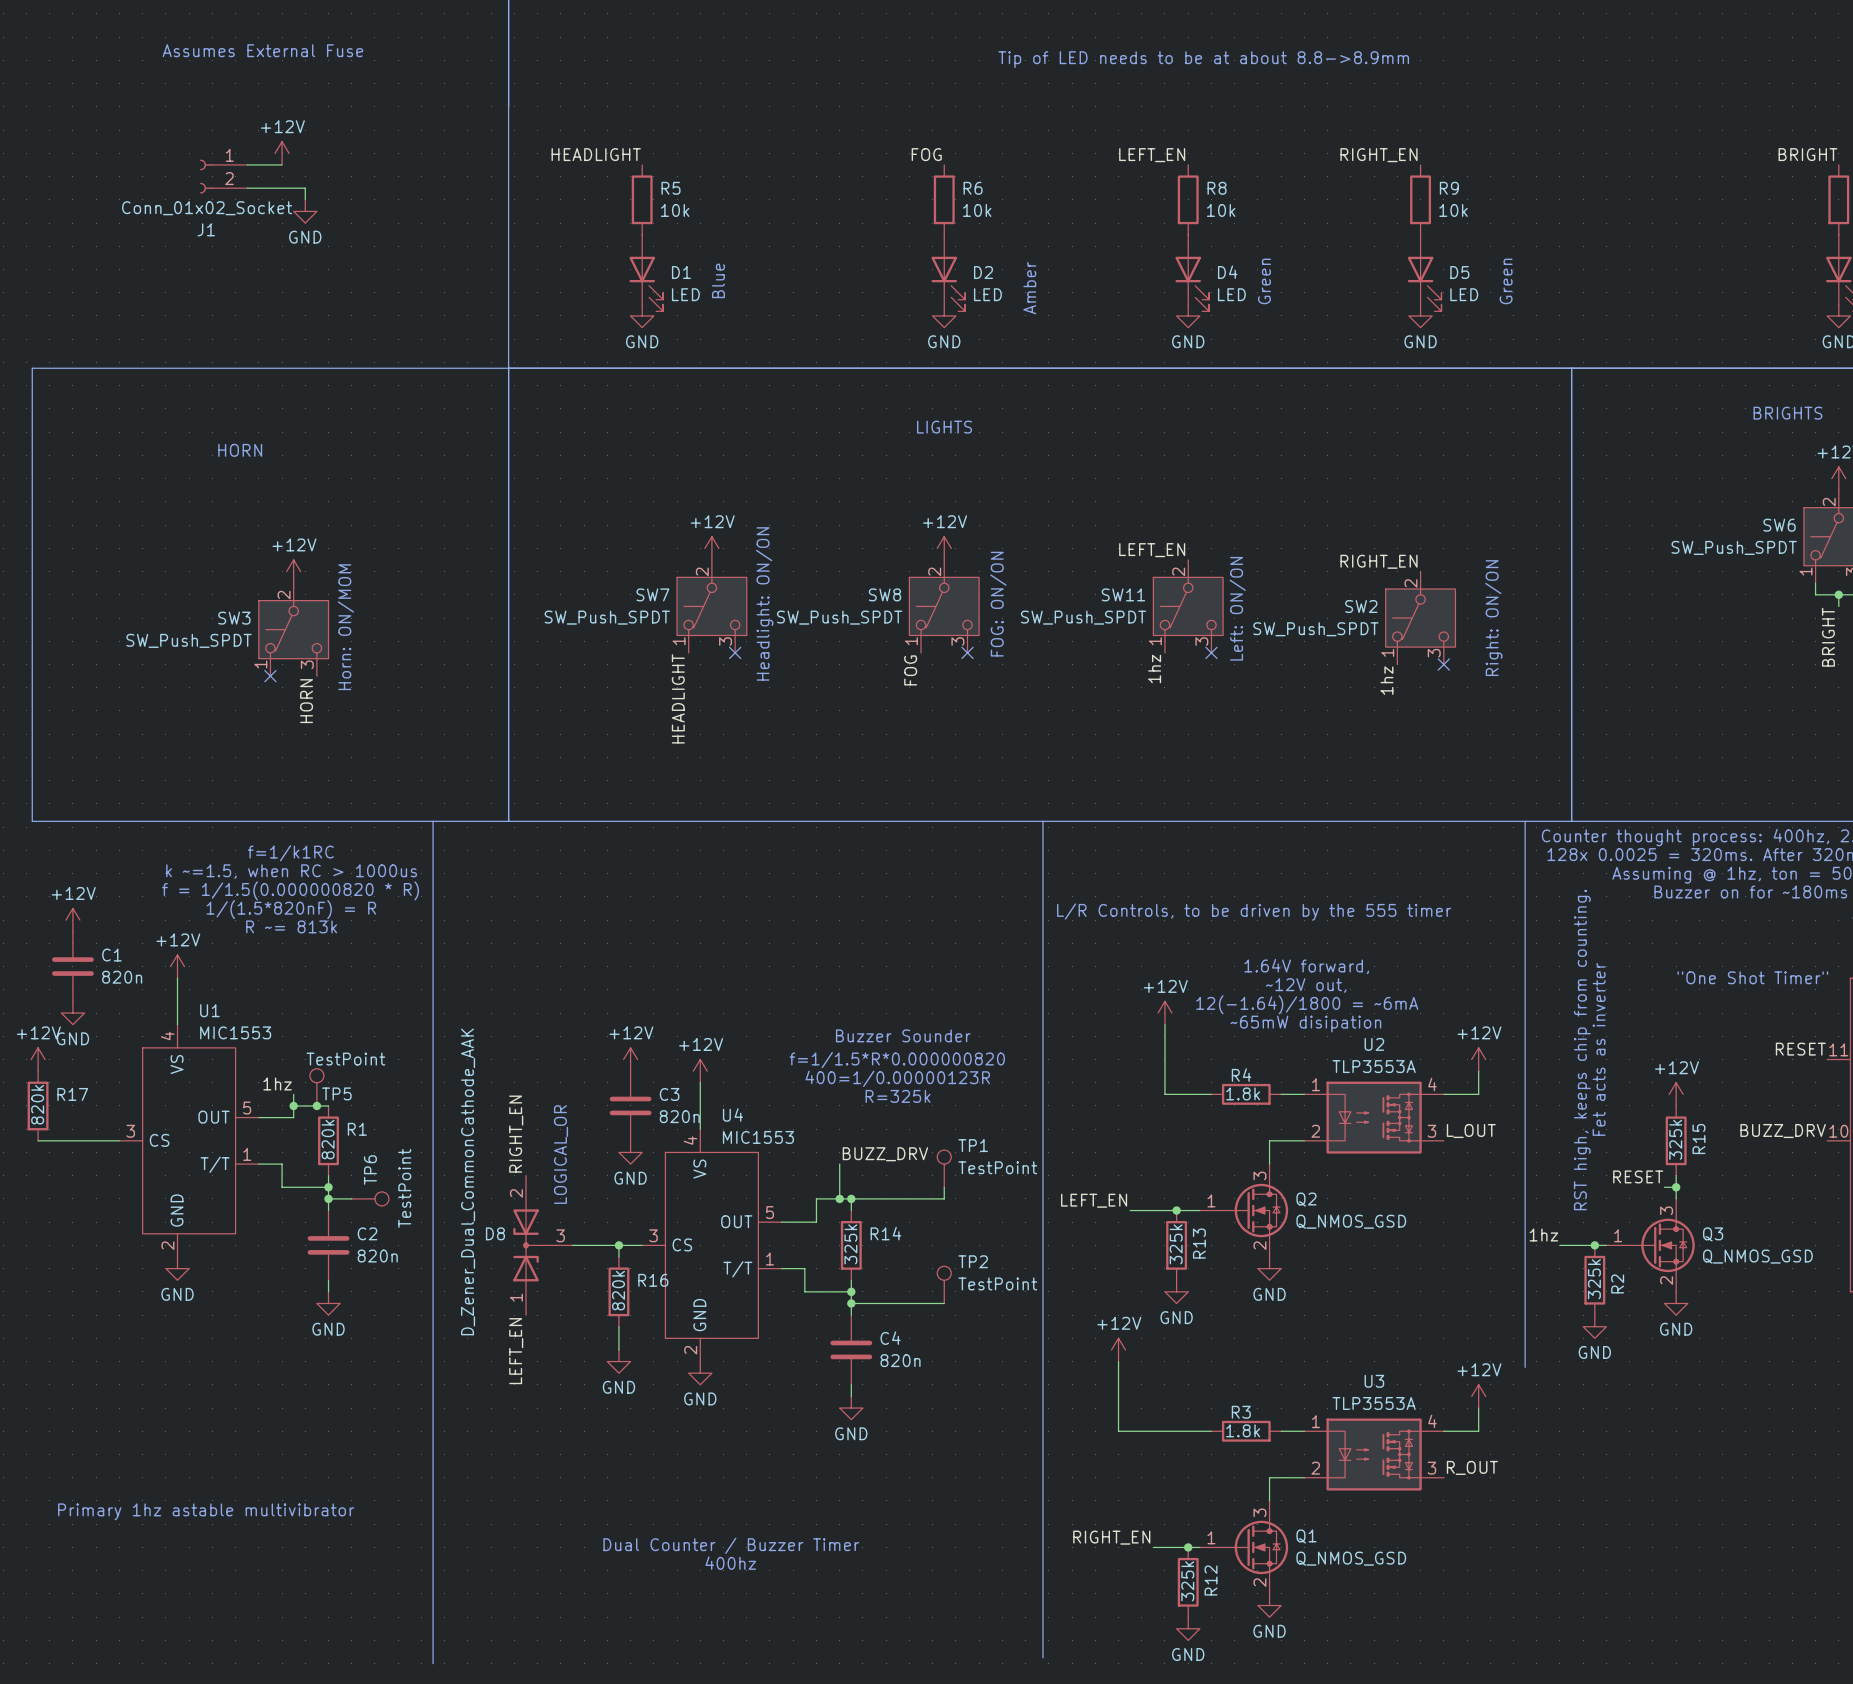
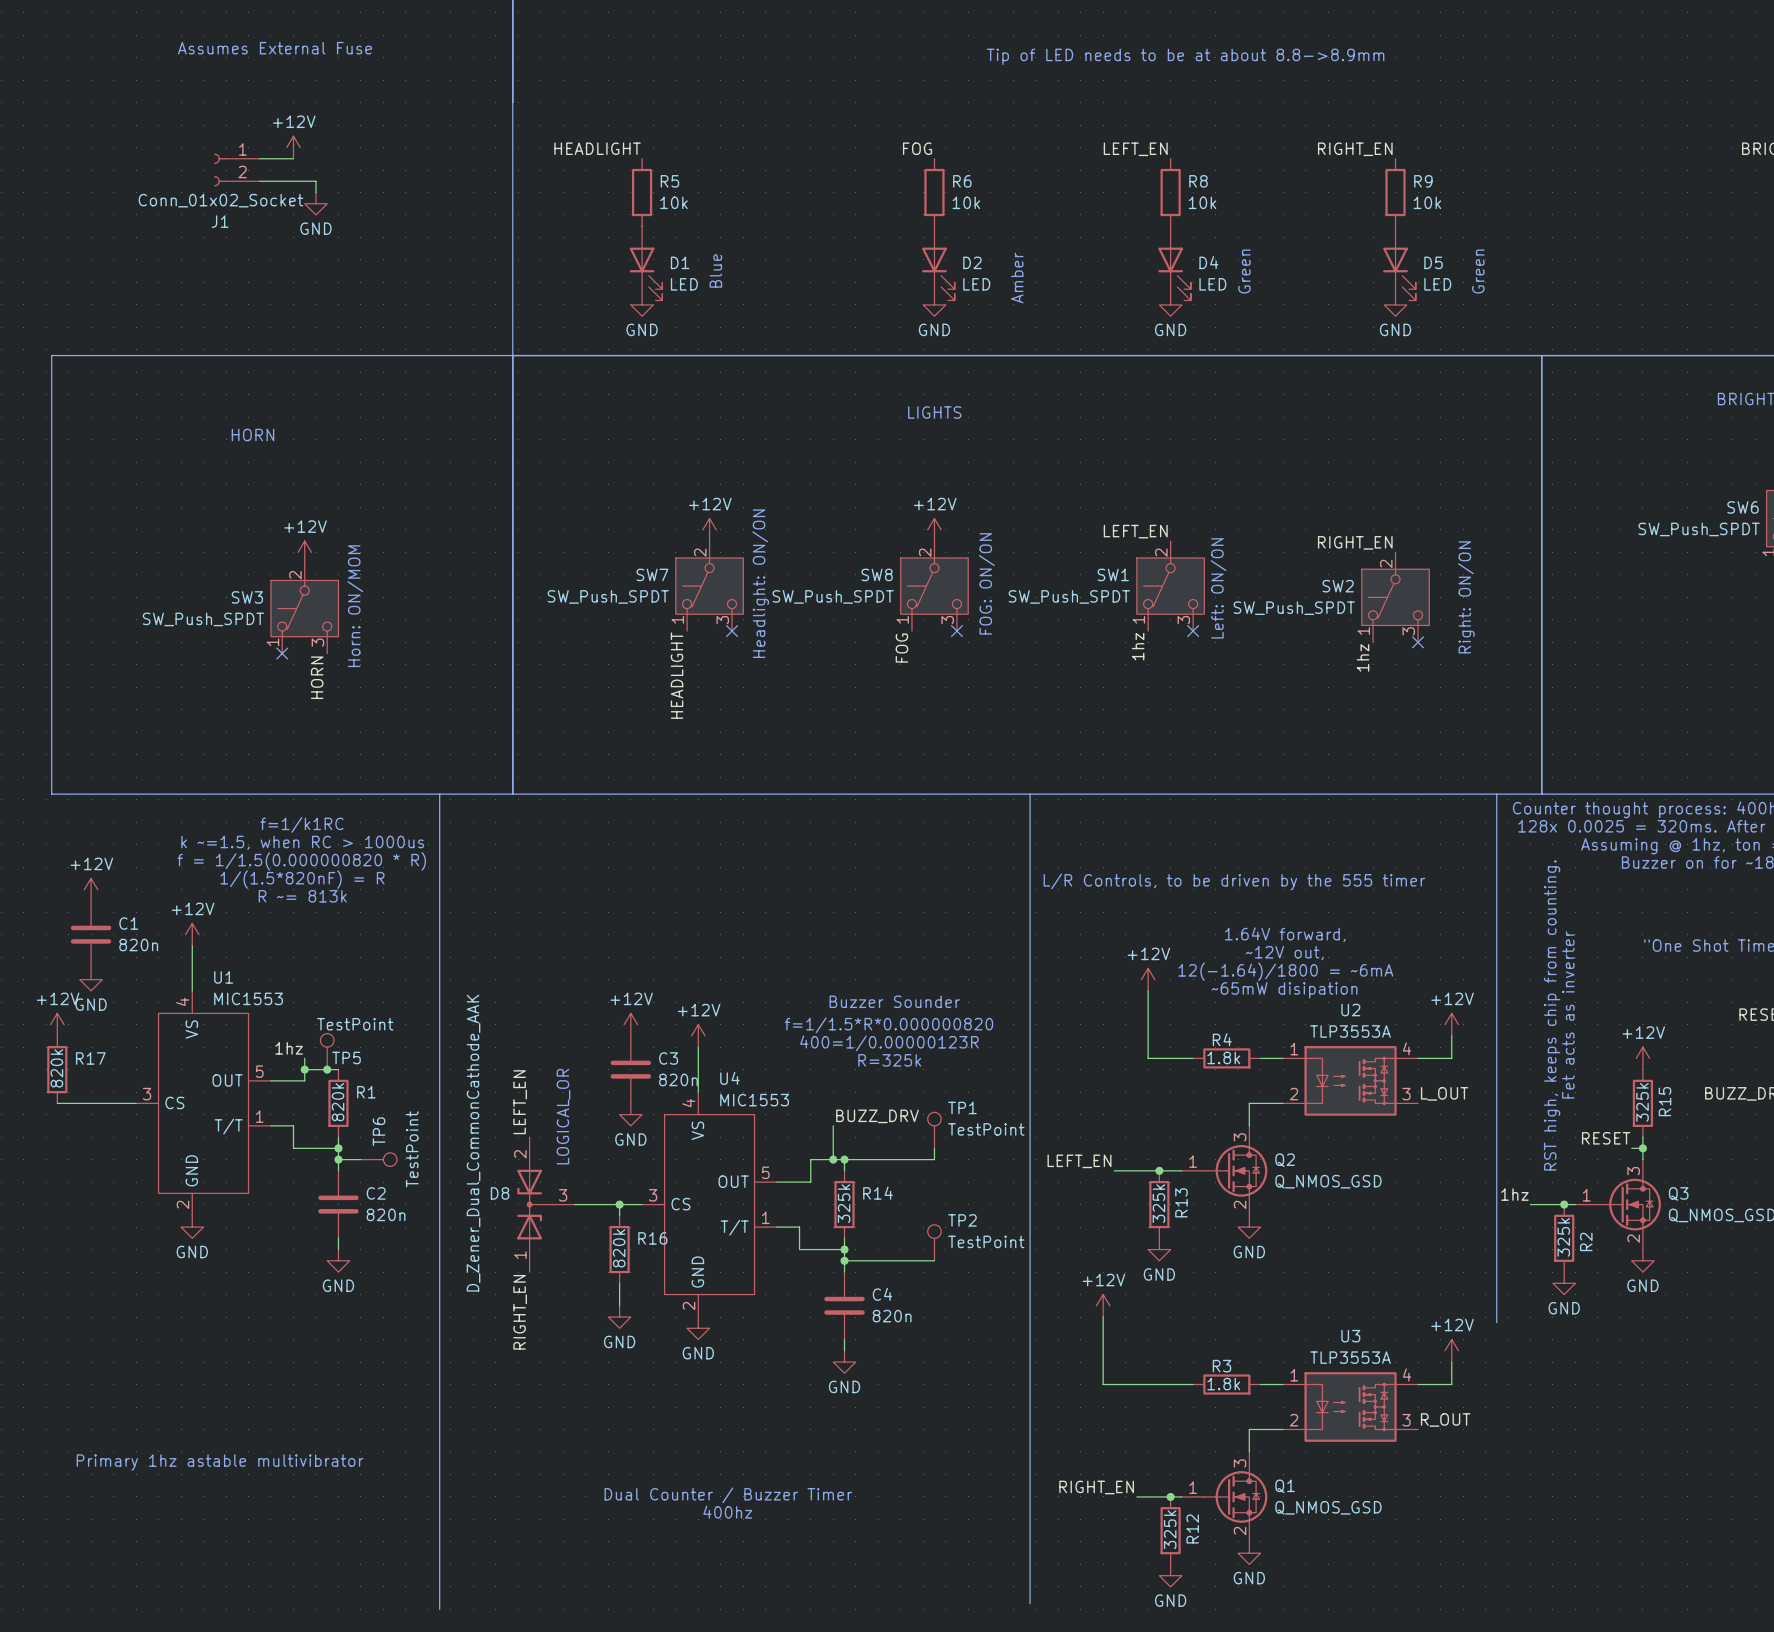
SW11 name: SW11 (1123, 594) -> SW1 (1113, 574)
label: RIGHT_EN (516, 1134) -> LEFT_EN (520, 1102)
label: LEFT_EN (516, 1351) -> RIGHT_EN (520, 1312)

